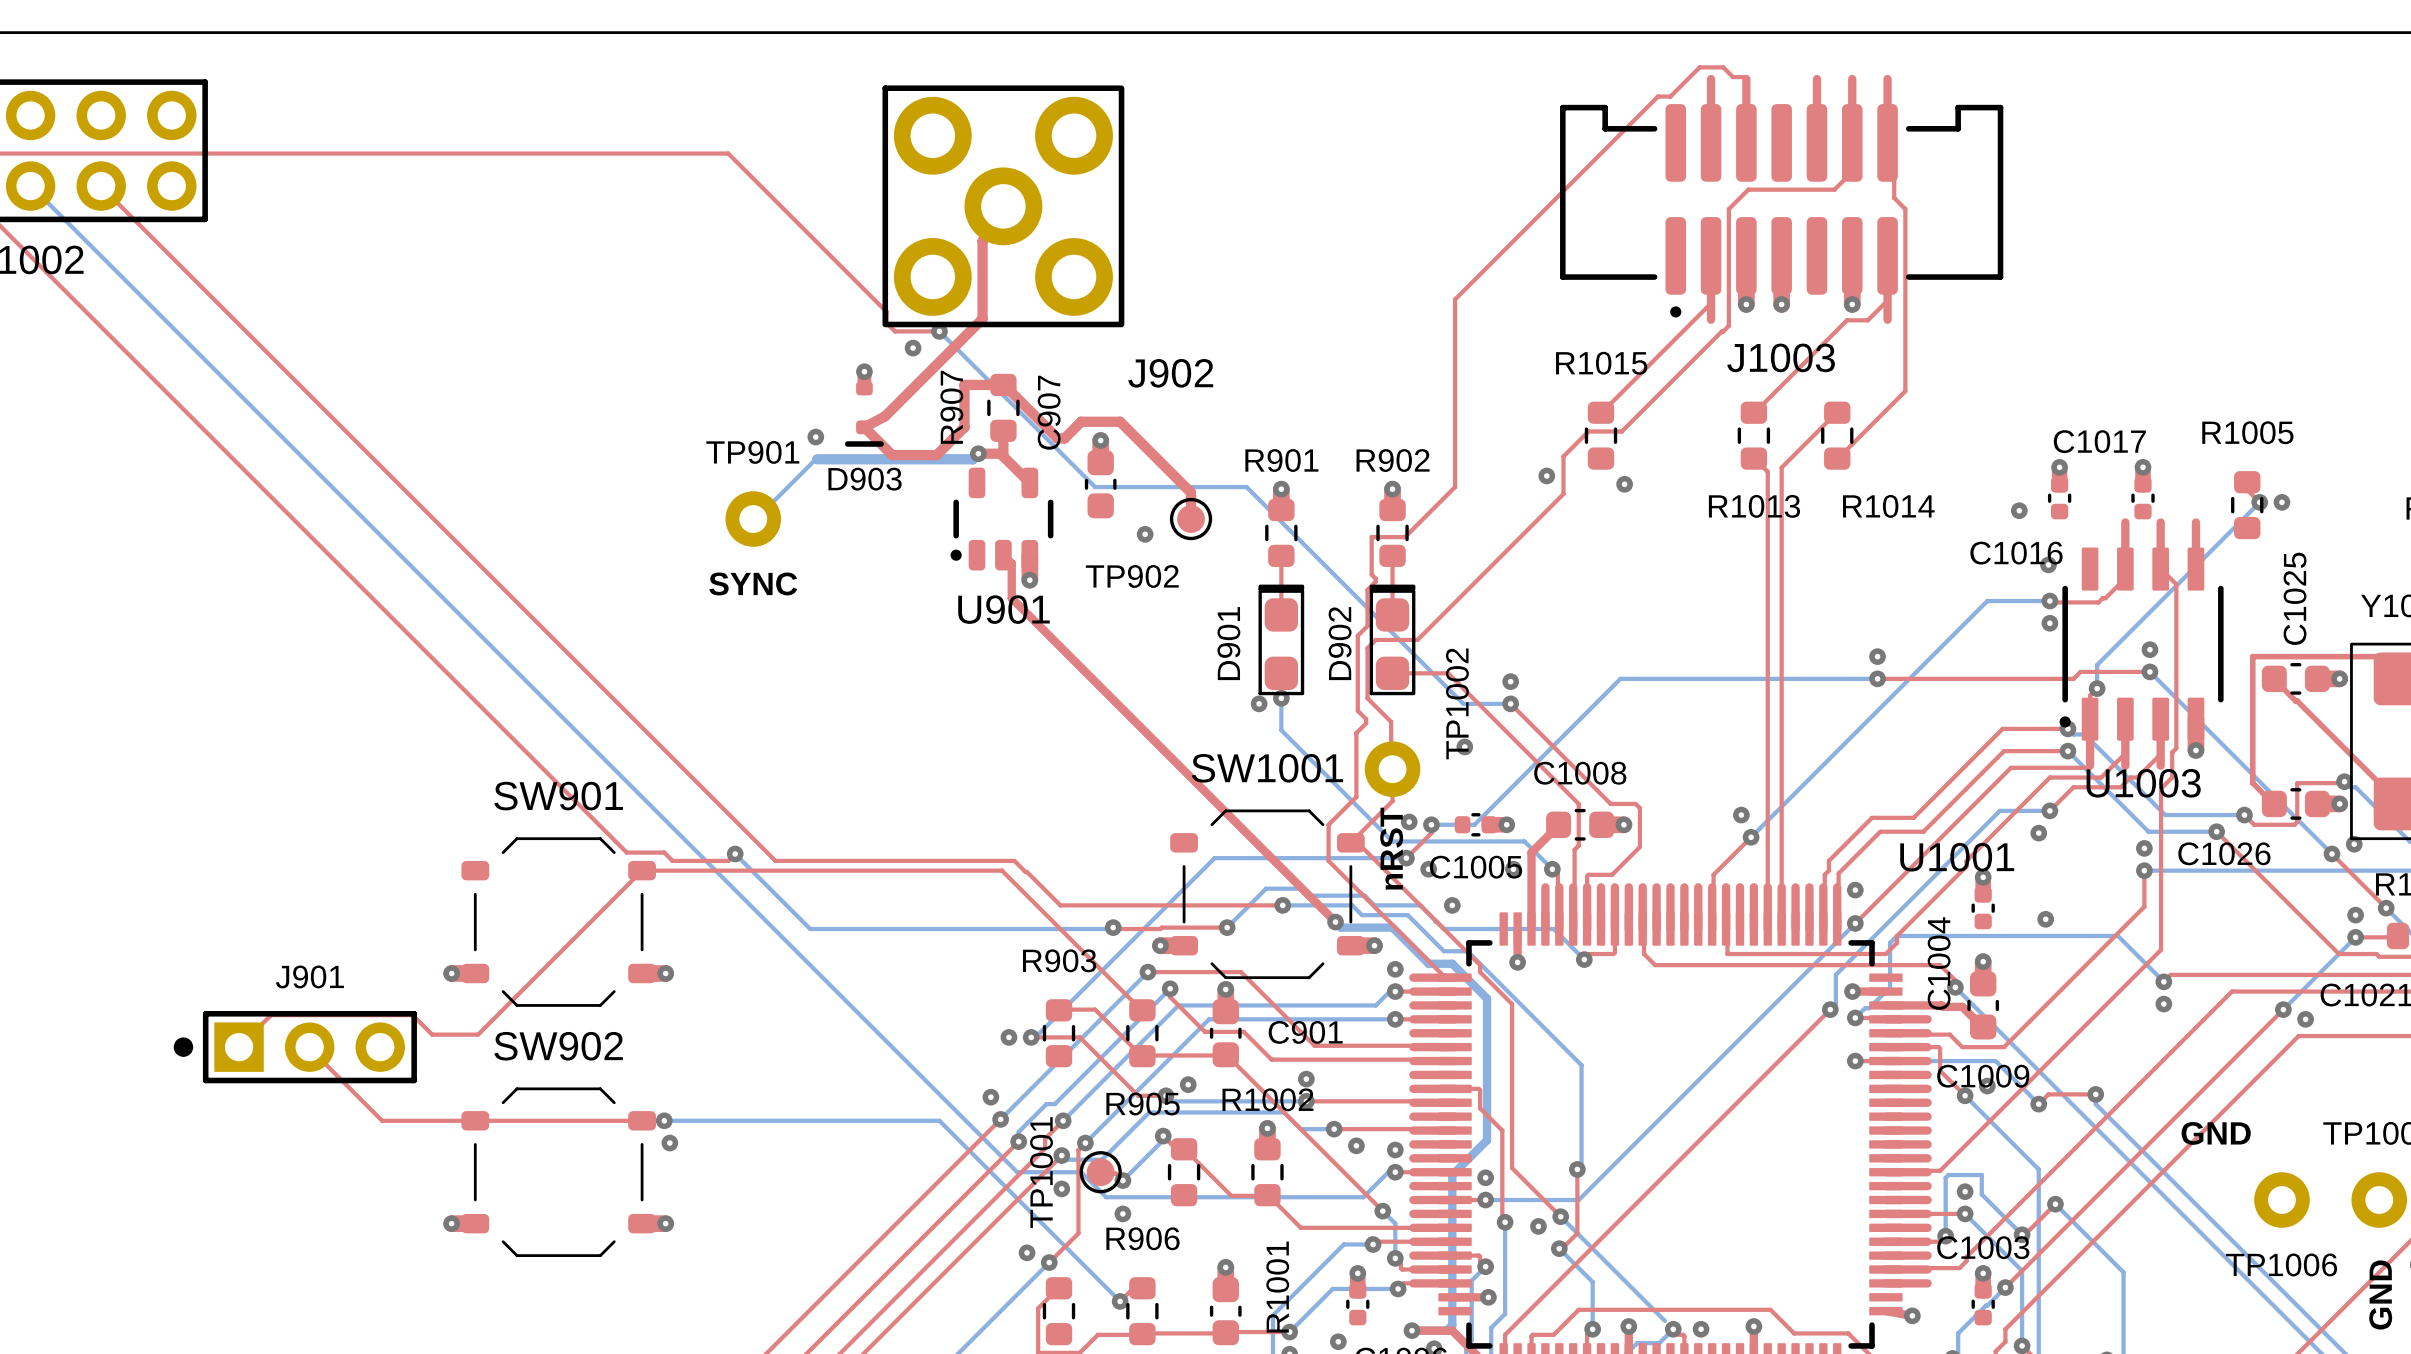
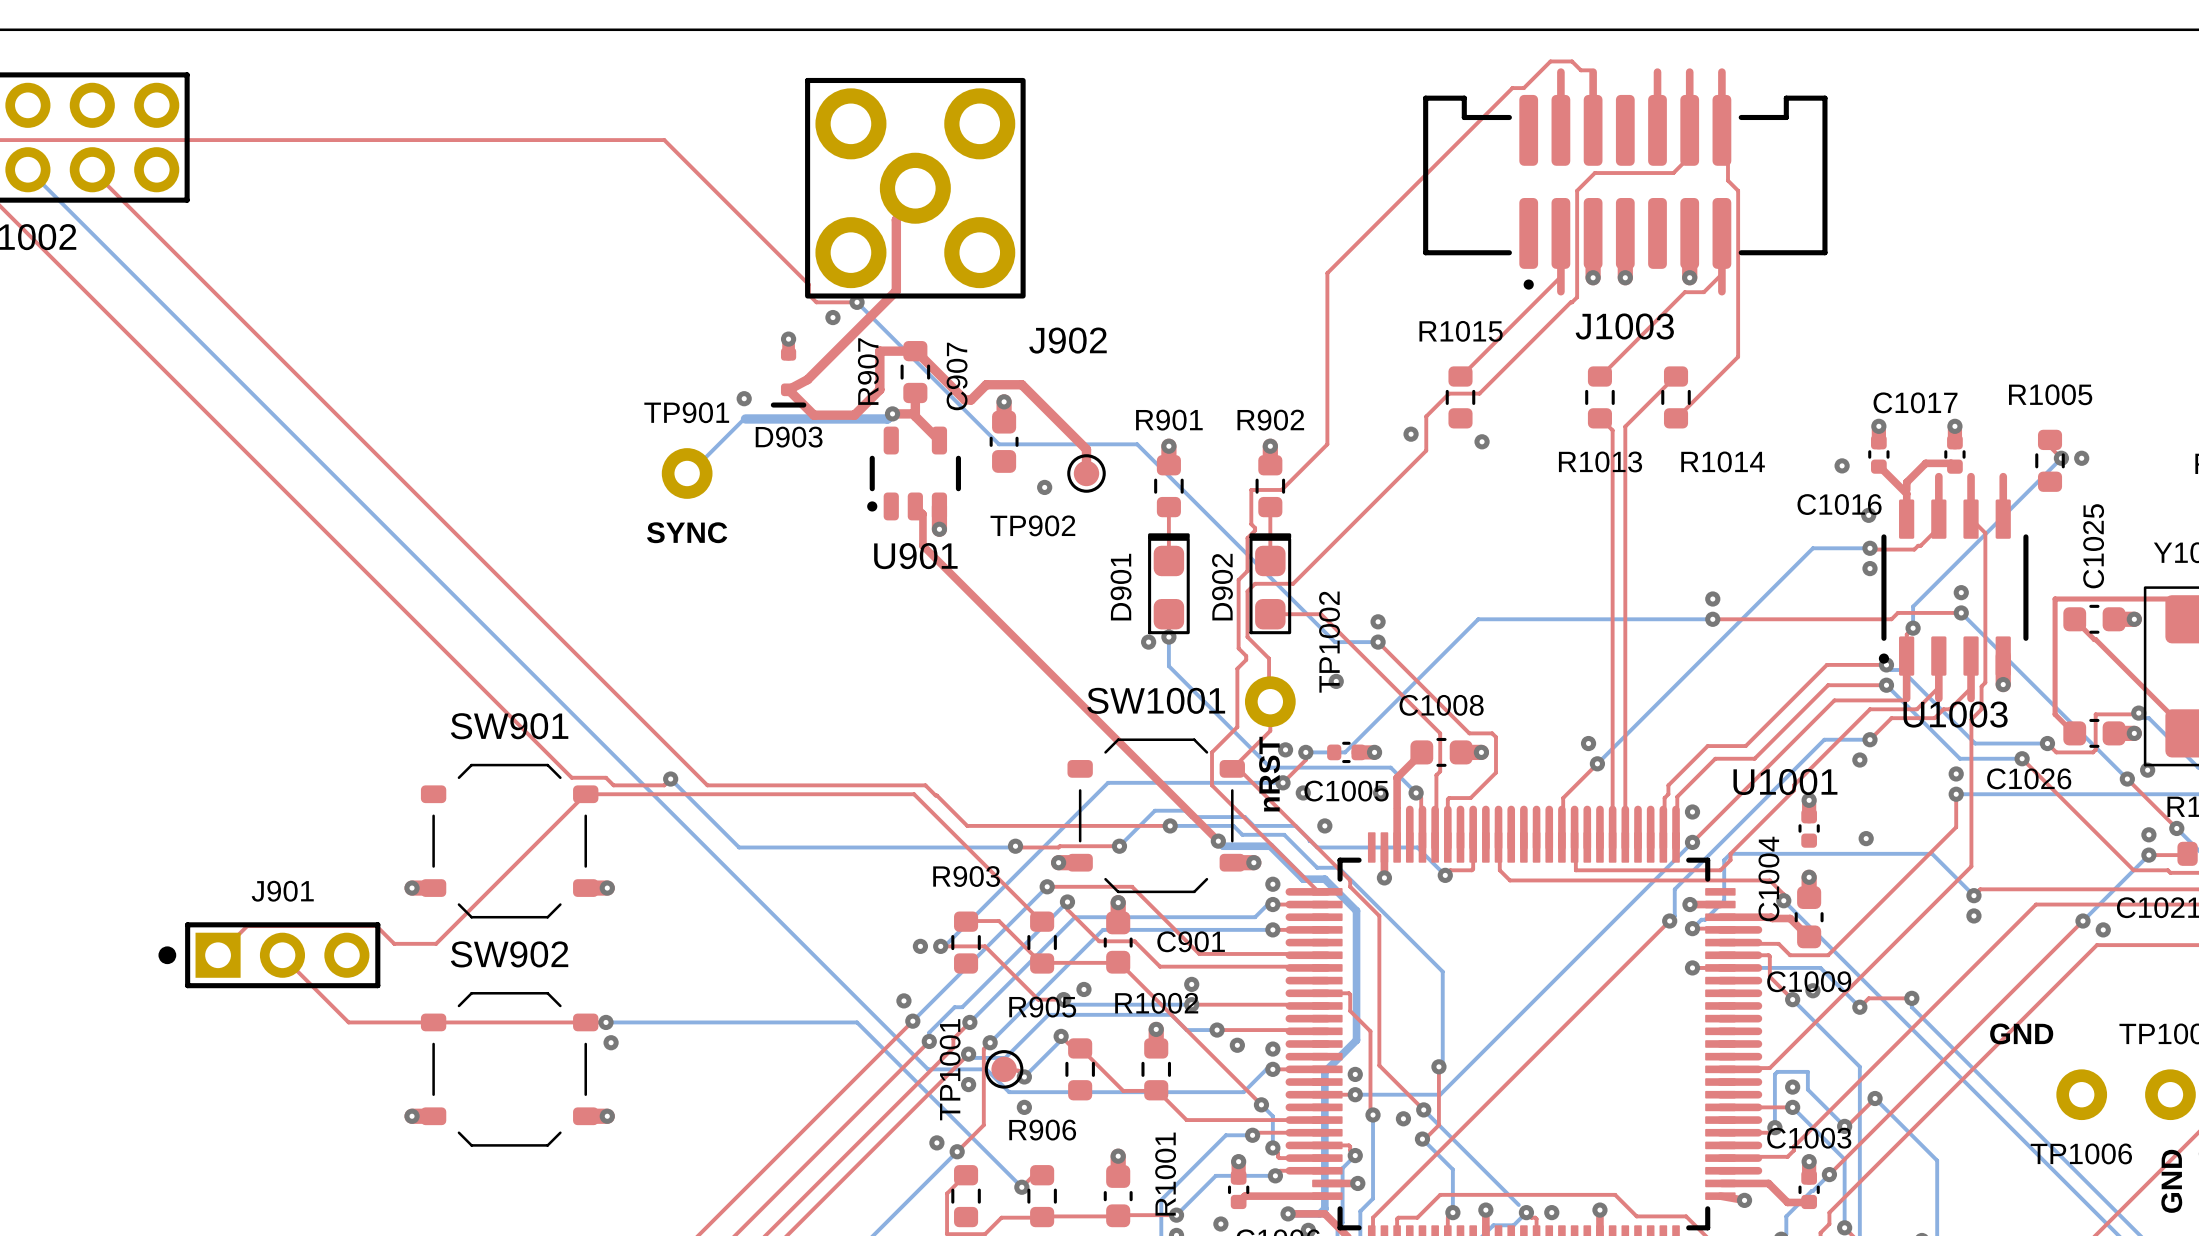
top track: none -> (1953, 465) (1951, 463) (1925, 463) (1906, 482) (1906, 489)
top track: none -> (1880, 467) (1906, 493) (1906, 517)
top track: none -> (1721, 1183) (1768, 1183) (1787, 1202) (1807, 1202)
top track: none -> (1326, 1196) (1244, 1196) (1239, 1201)

